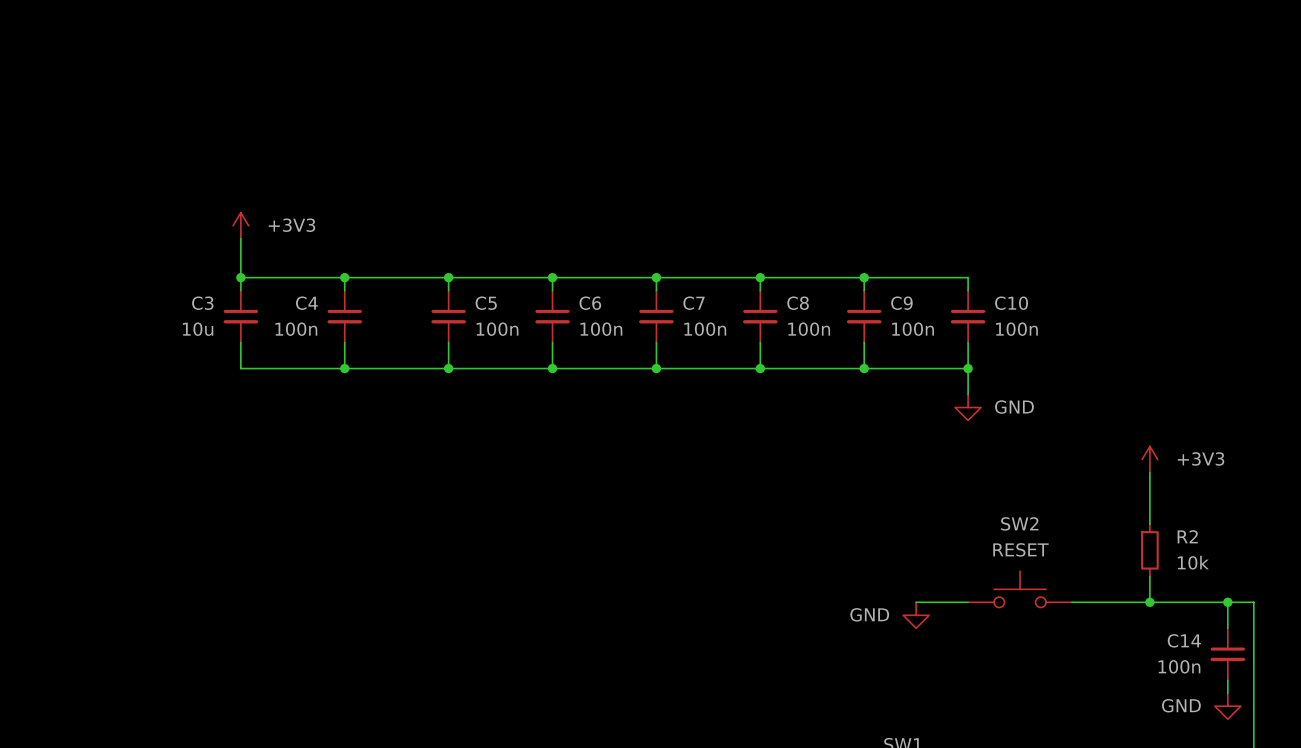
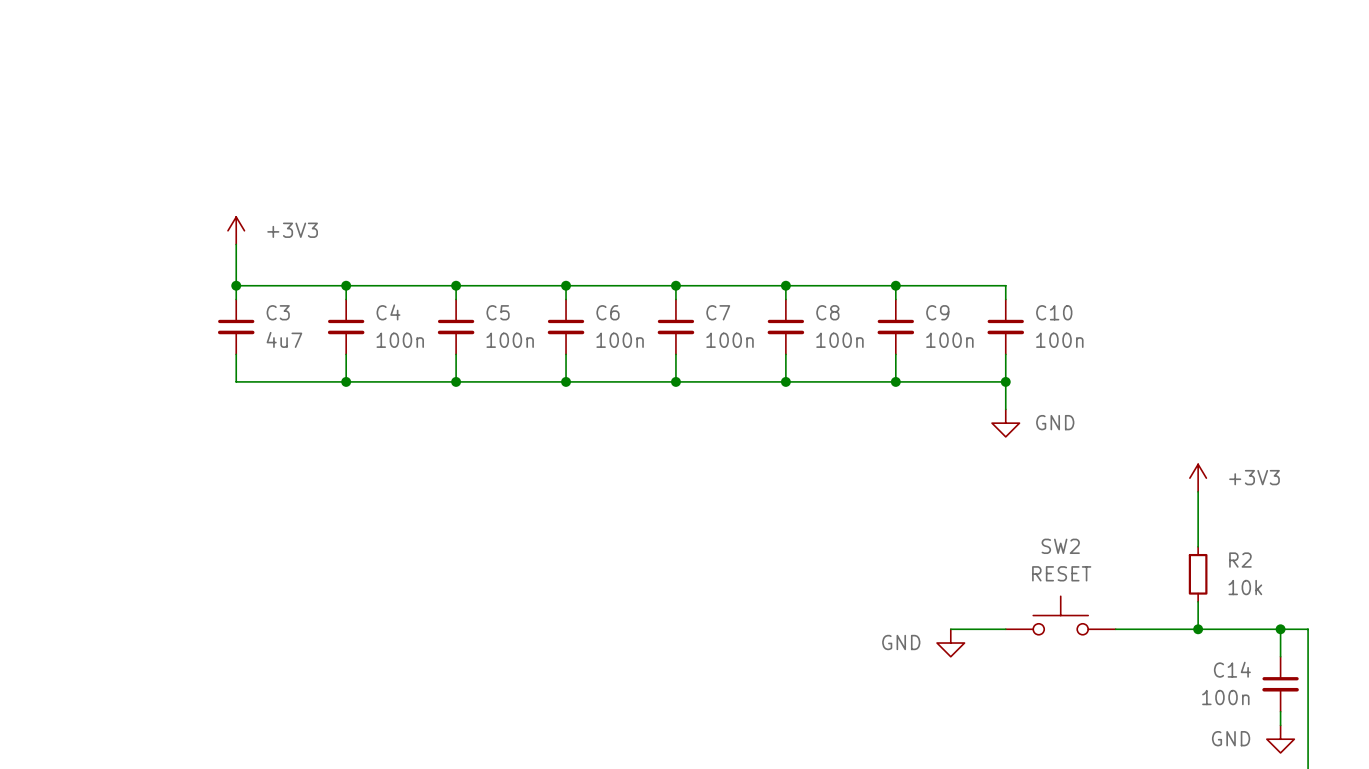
C3 name position: C3 (202, 303) -> C3 (278, 312)
C4 name position: C4 (306, 303) -> C4 (388, 312)
C3 value: 10u (198, 329) -> 4u7 (284, 339)
C4 value position: 100n (296, 329) -> 100n (400, 340)

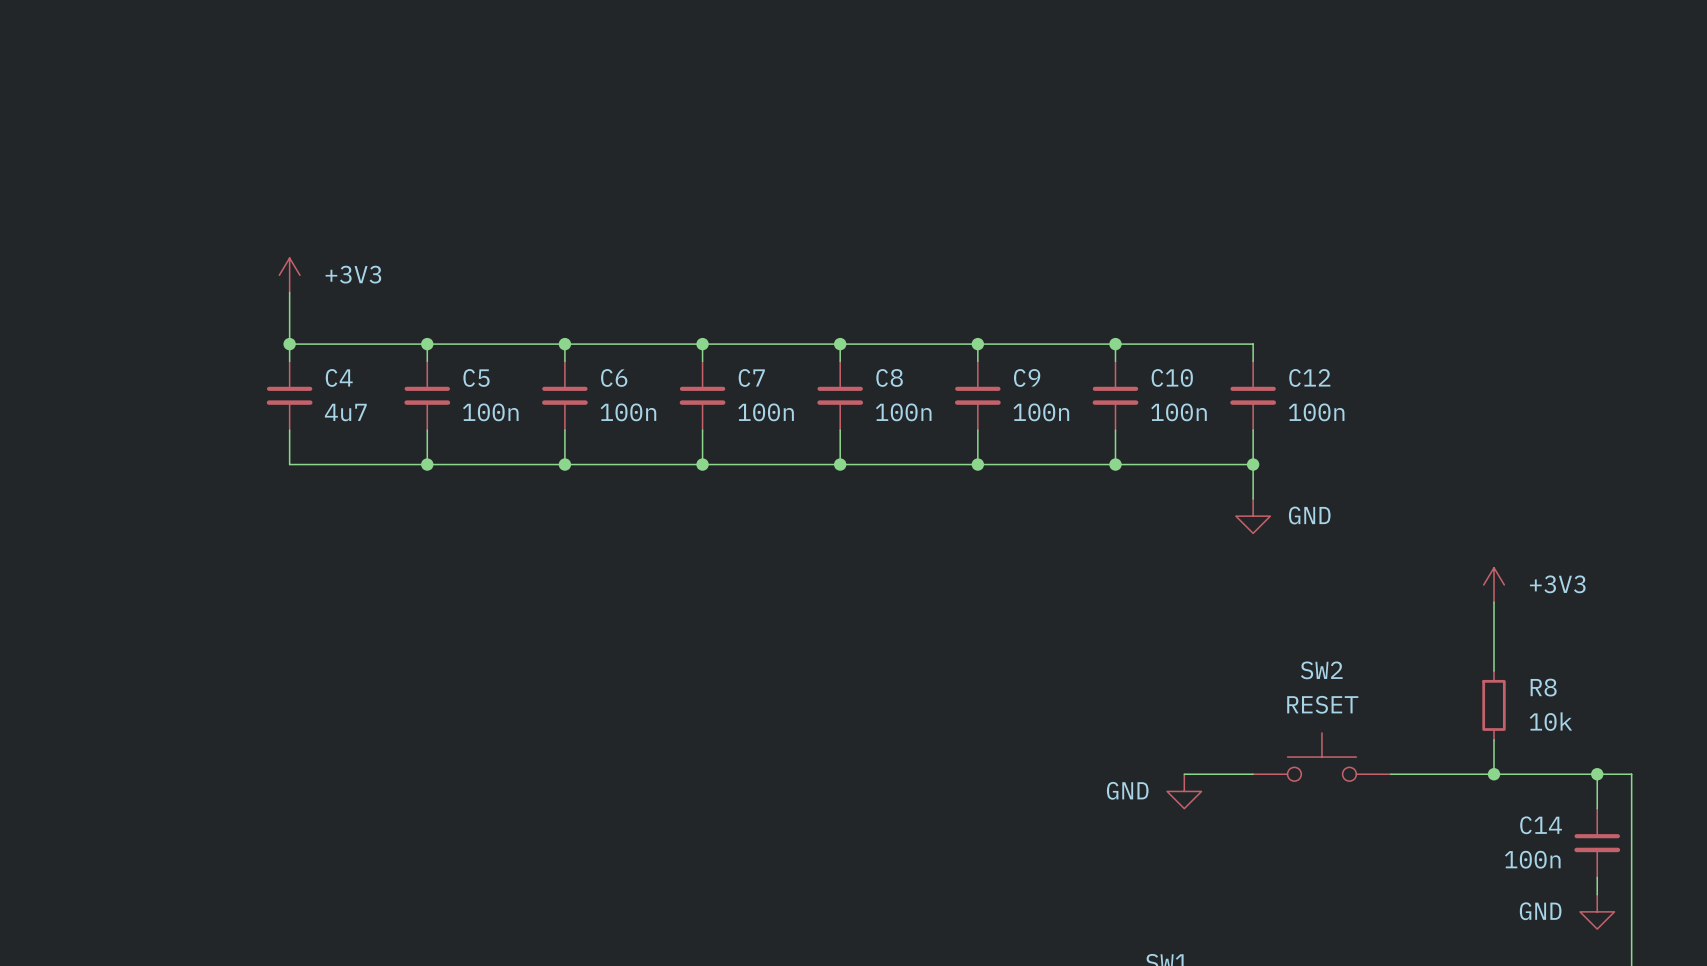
C3 name: C3 (278, 312) -> C4 (339, 377)
C4 name: C4 (388, 312) -> C5 (476, 377)
C5 name: C5 (498, 312) -> C6 (614, 377)
C6 name: C6 (608, 312) -> C7 (751, 377)
C7 name: C7 (718, 312) -> C8 (889, 377)
C8 name: C8 (827, 312) -> C9 (1027, 377)
C9 name: C9 (937, 312) -> C10 (1172, 377)
C10 name: C10 (1054, 312) -> C12 (1309, 377)
R2 name: R2 (1240, 560) -> R8 (1543, 687)

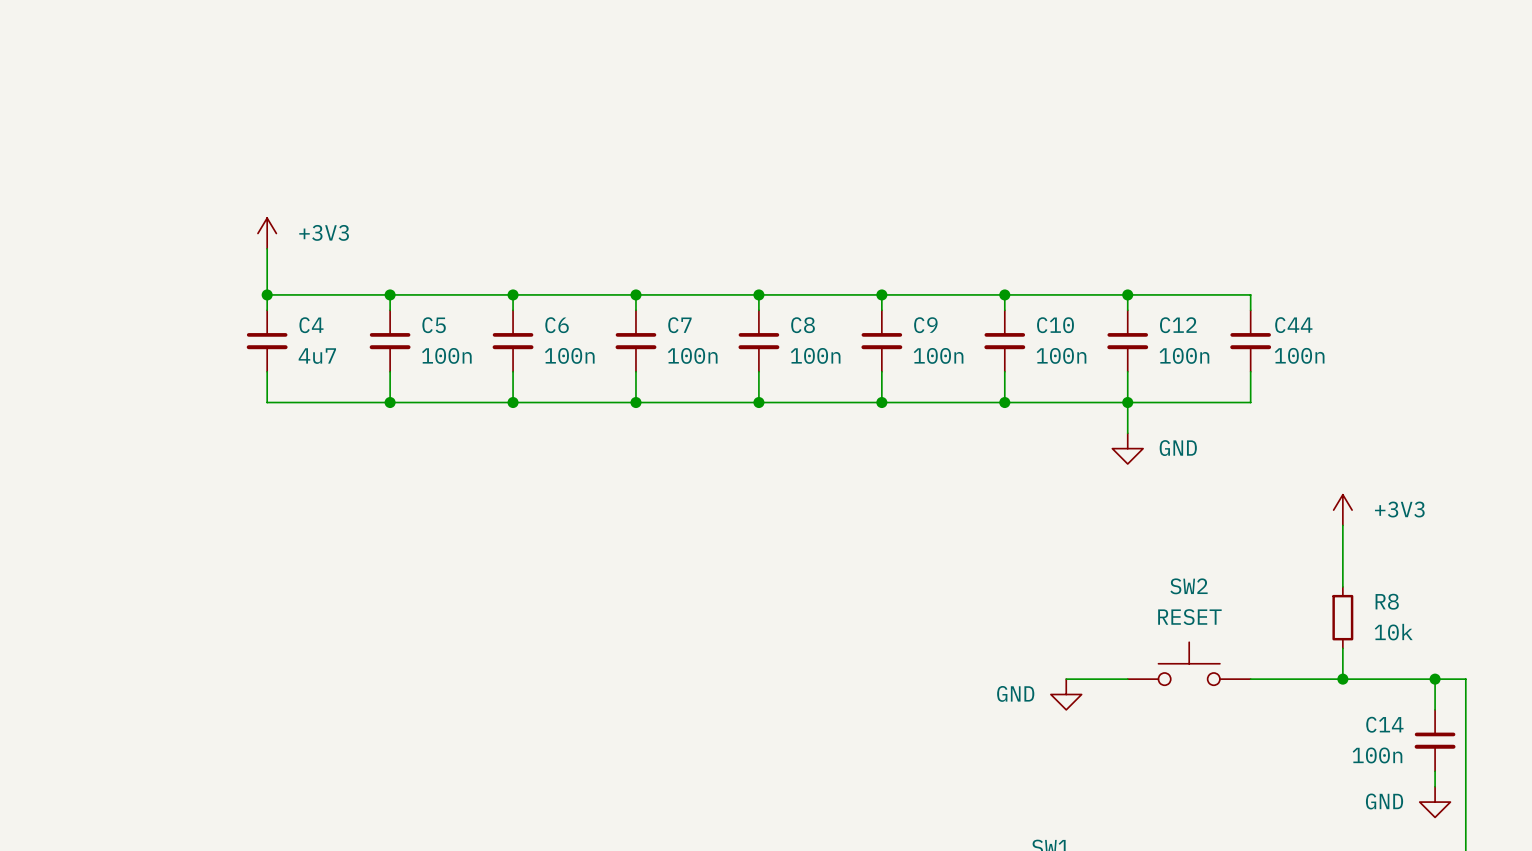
wire: none -> (1127, 294) (1250, 294) (1250, 310)
junction: none -> (1127, 294)
C44: none -> 100n (1250, 341)
wire: none -> (1250, 371) (1250, 402) (1127, 402)

